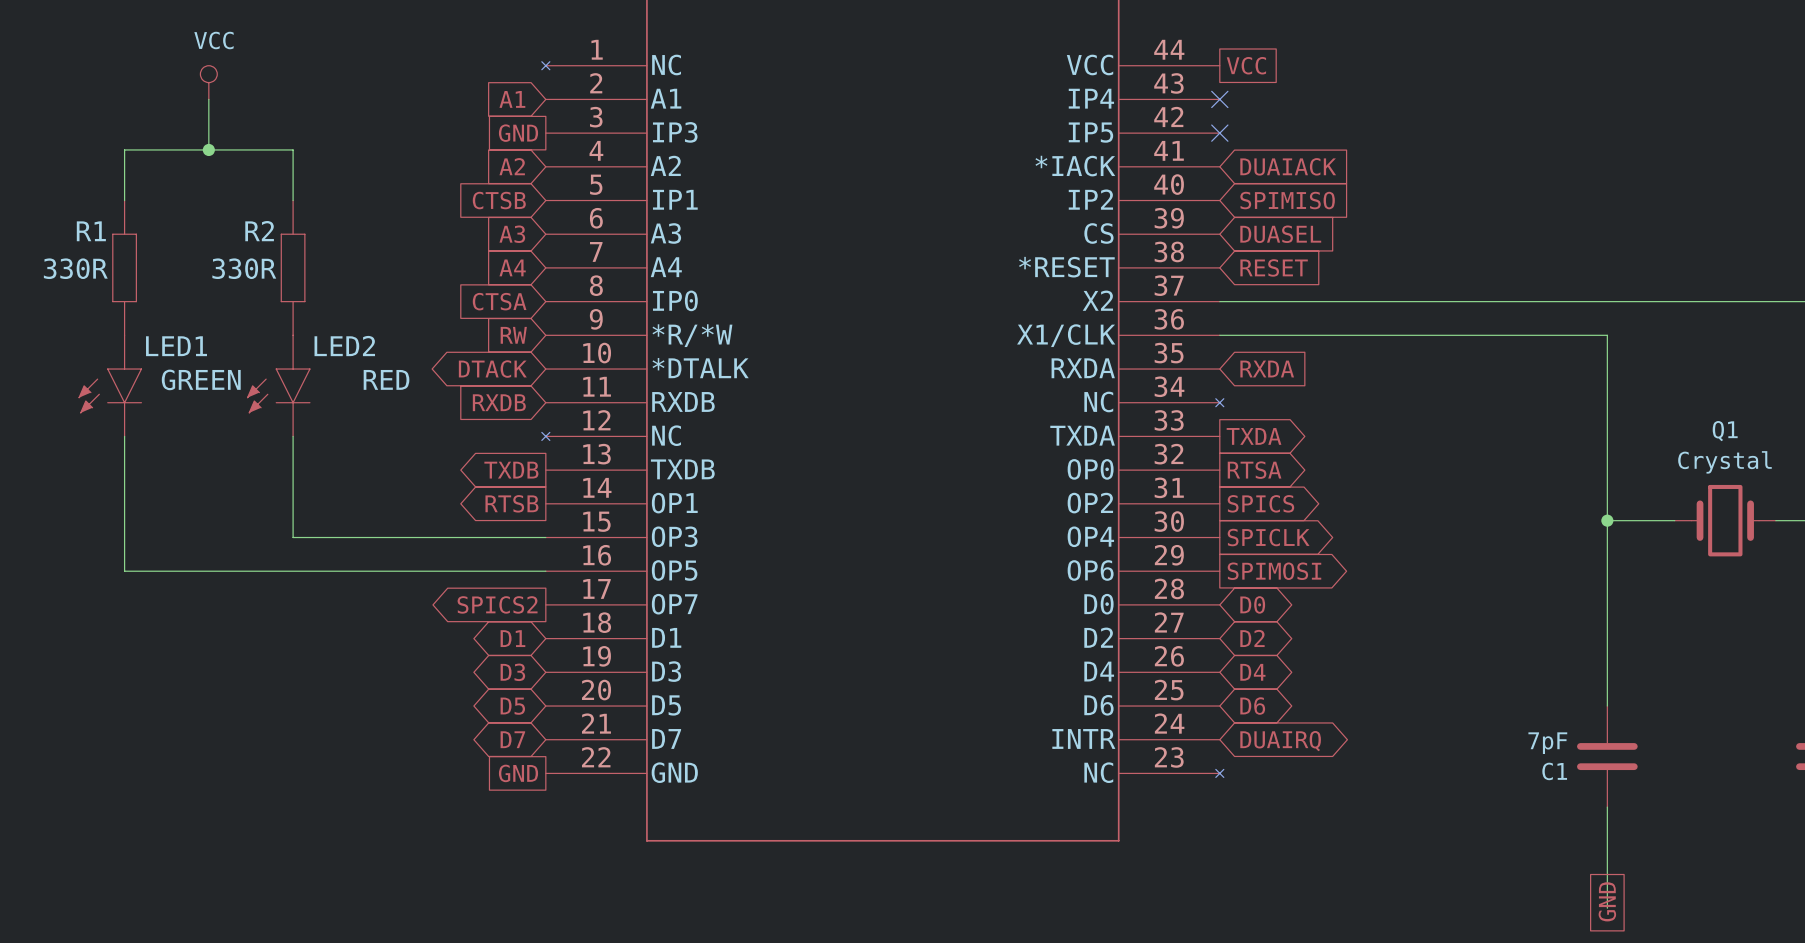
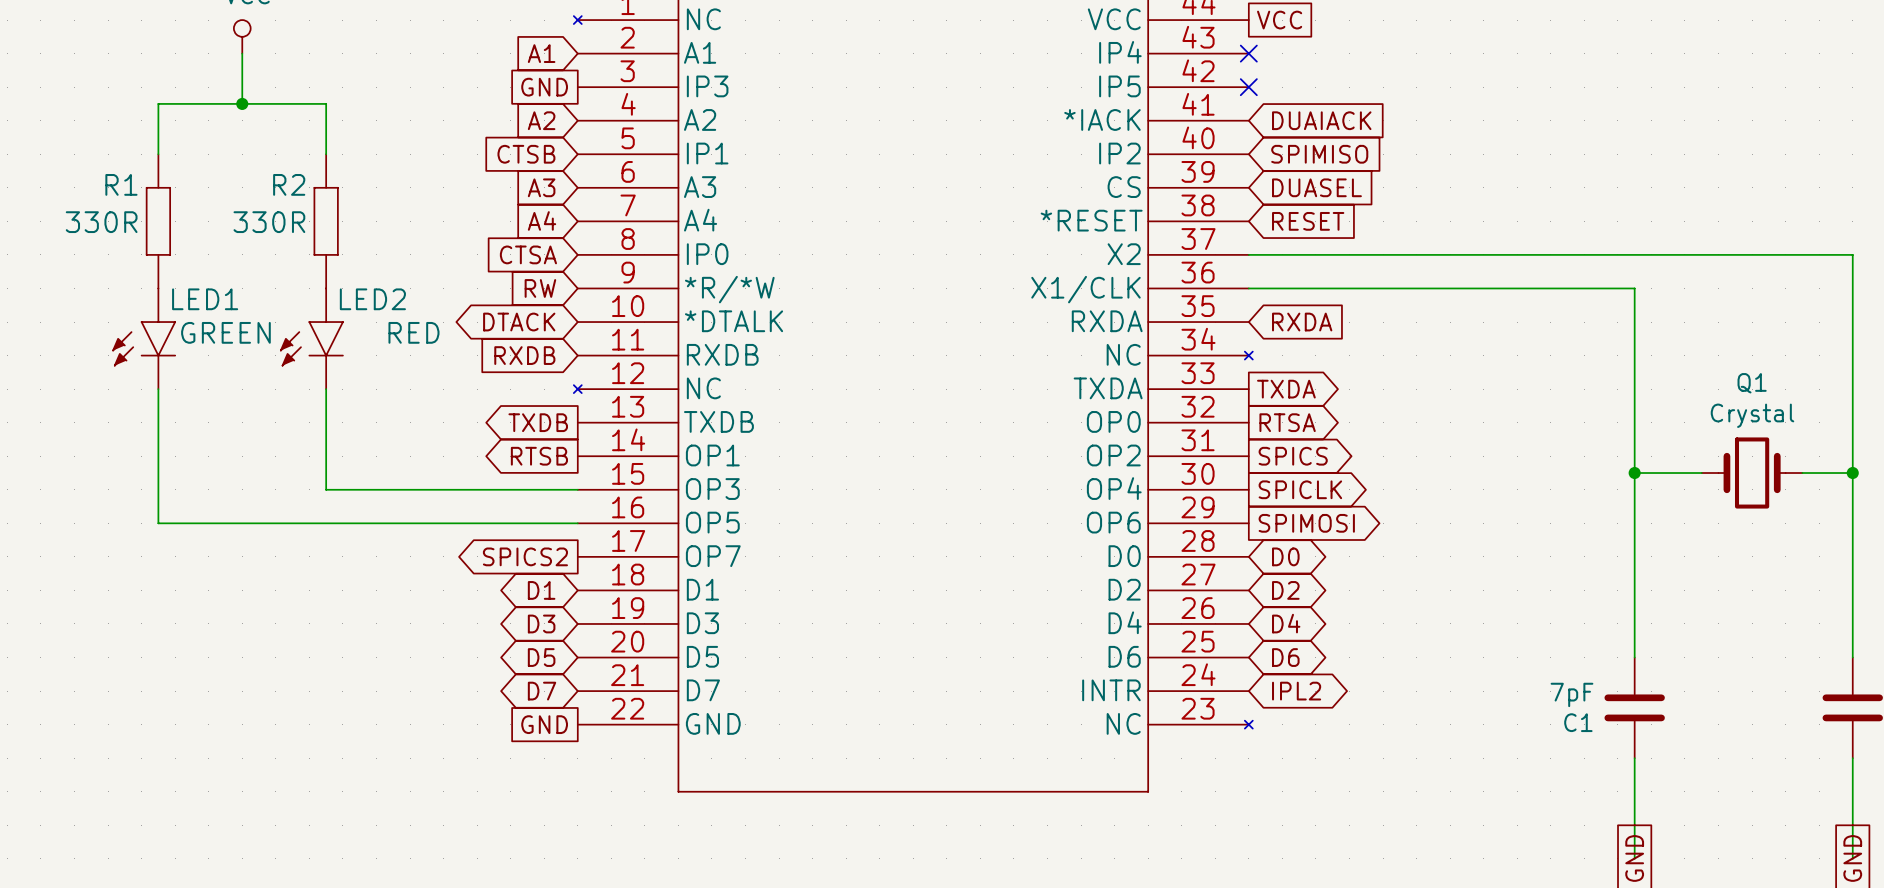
global label: DUAIRQ (1280, 741) -> IPL2 (1296, 691)

